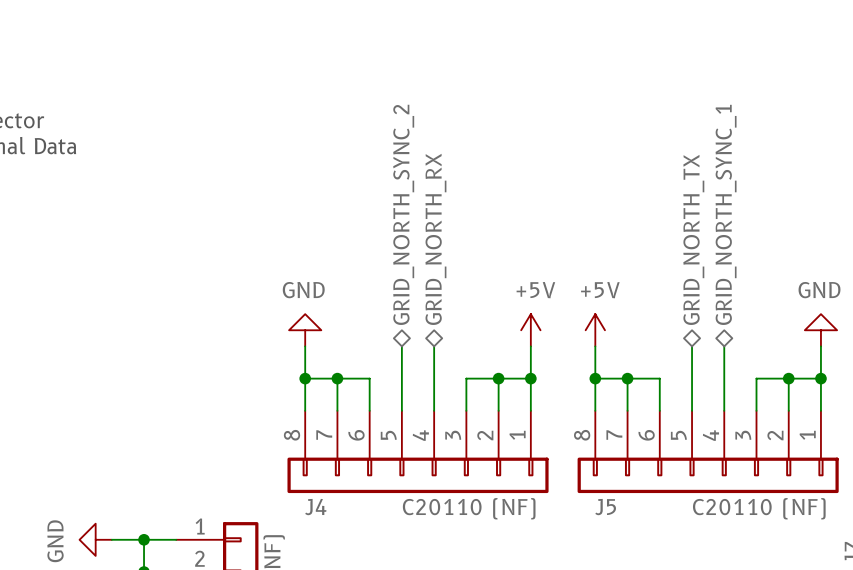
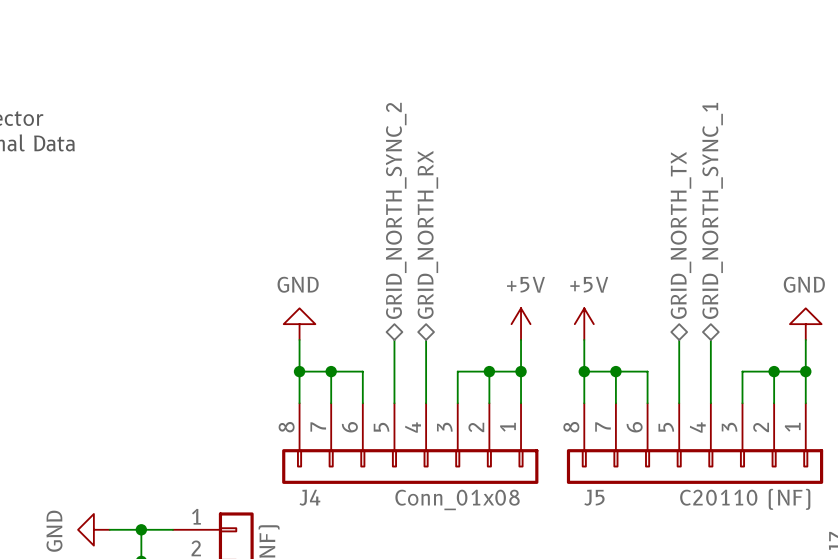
J4 value: C20110 (NF) (469, 508) -> Conn_01x08 (457, 499)

